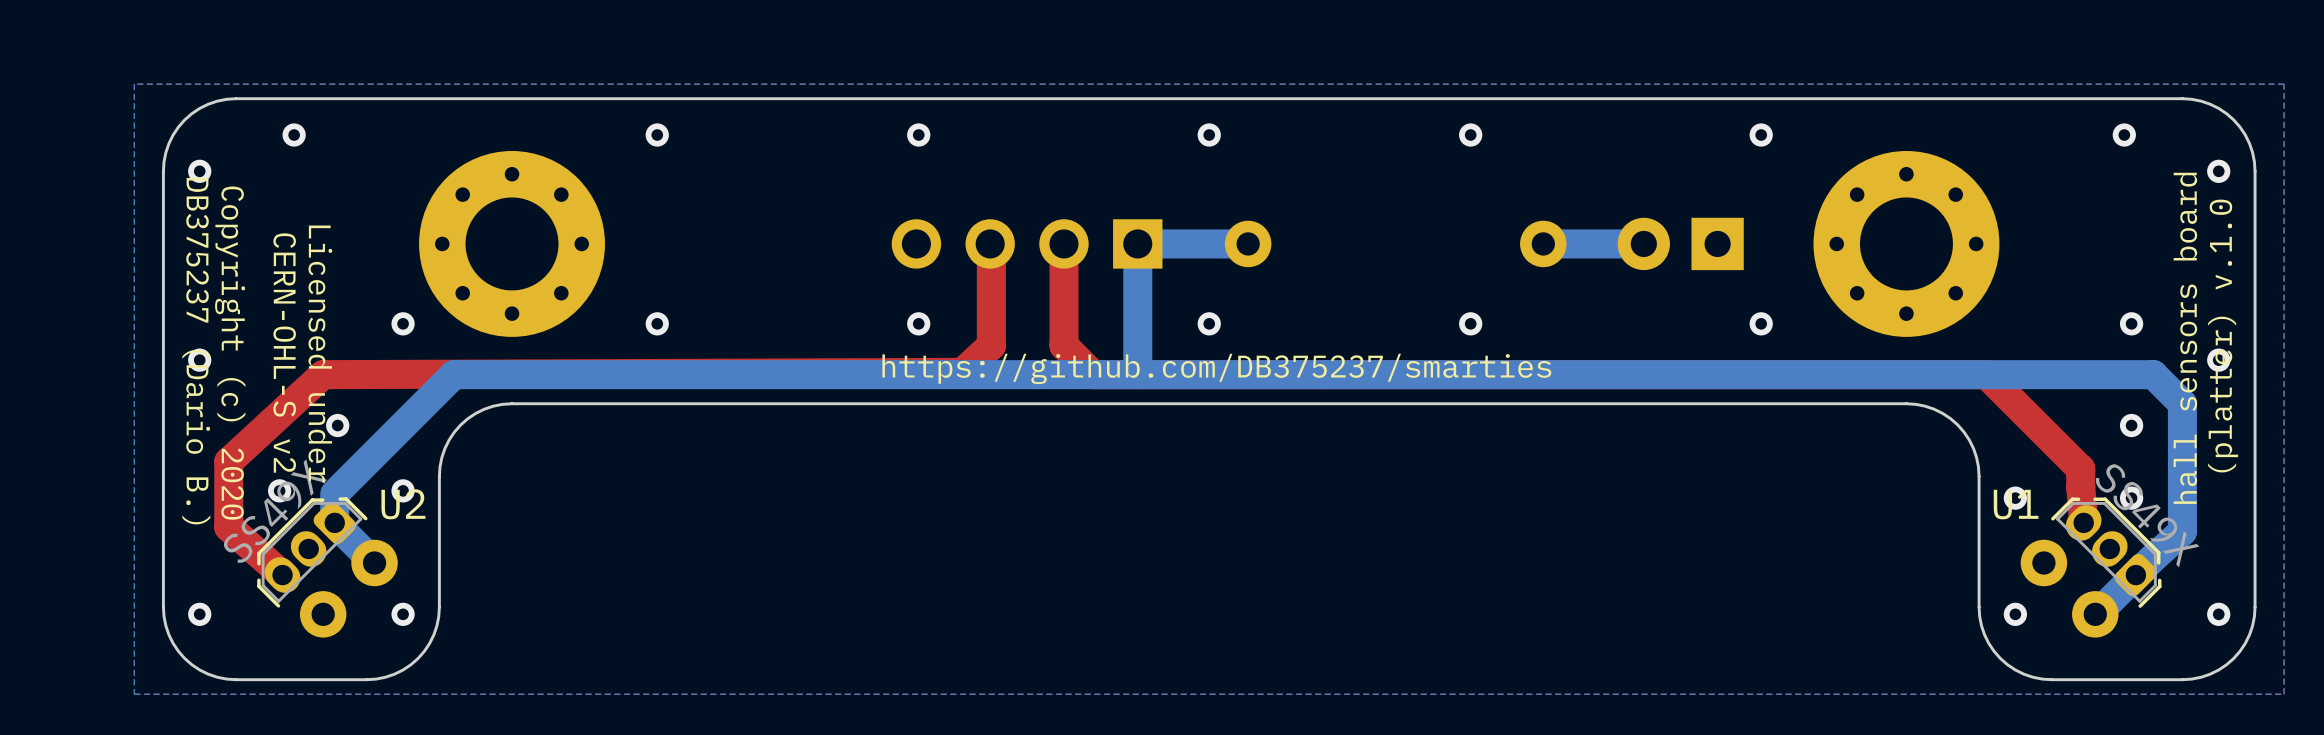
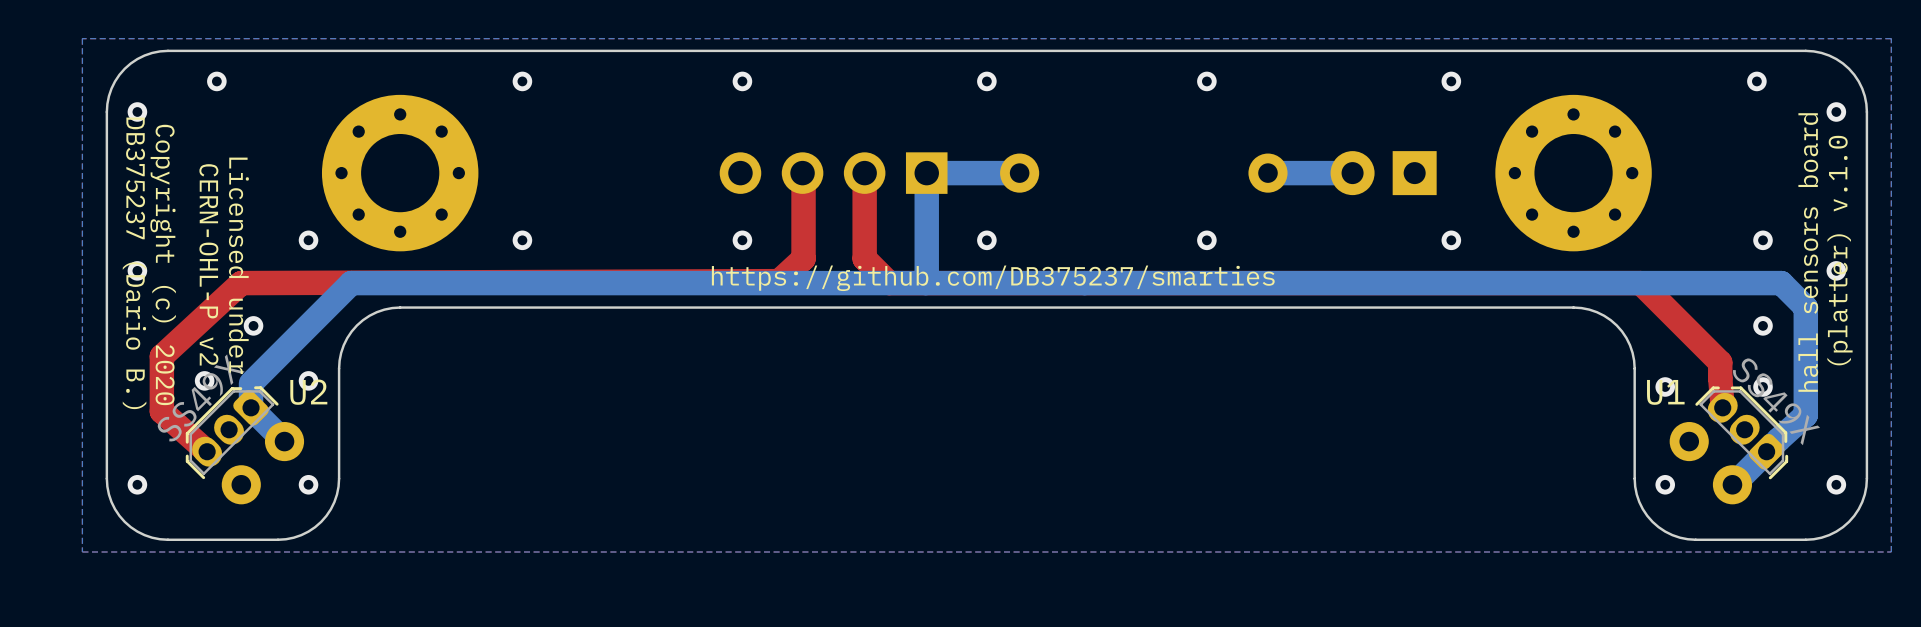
text: CERN-OHL-S v2 (284, 353) -> CERN-OHL-P v2 (208, 264)

